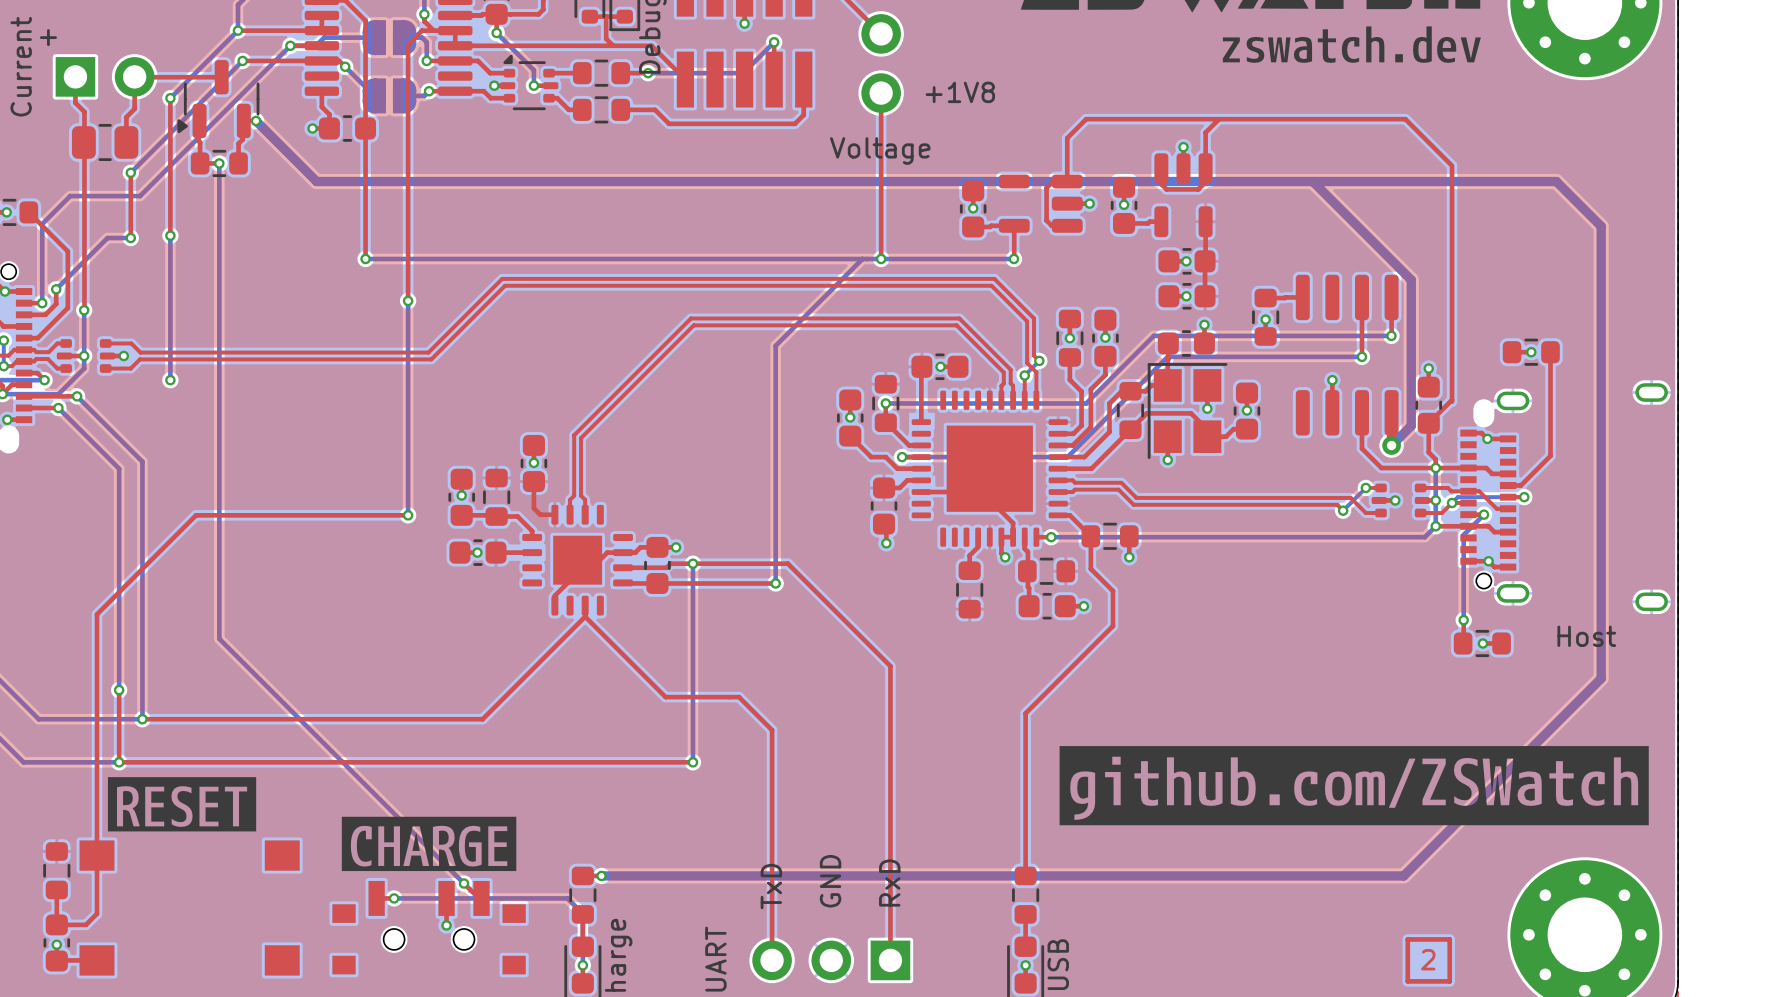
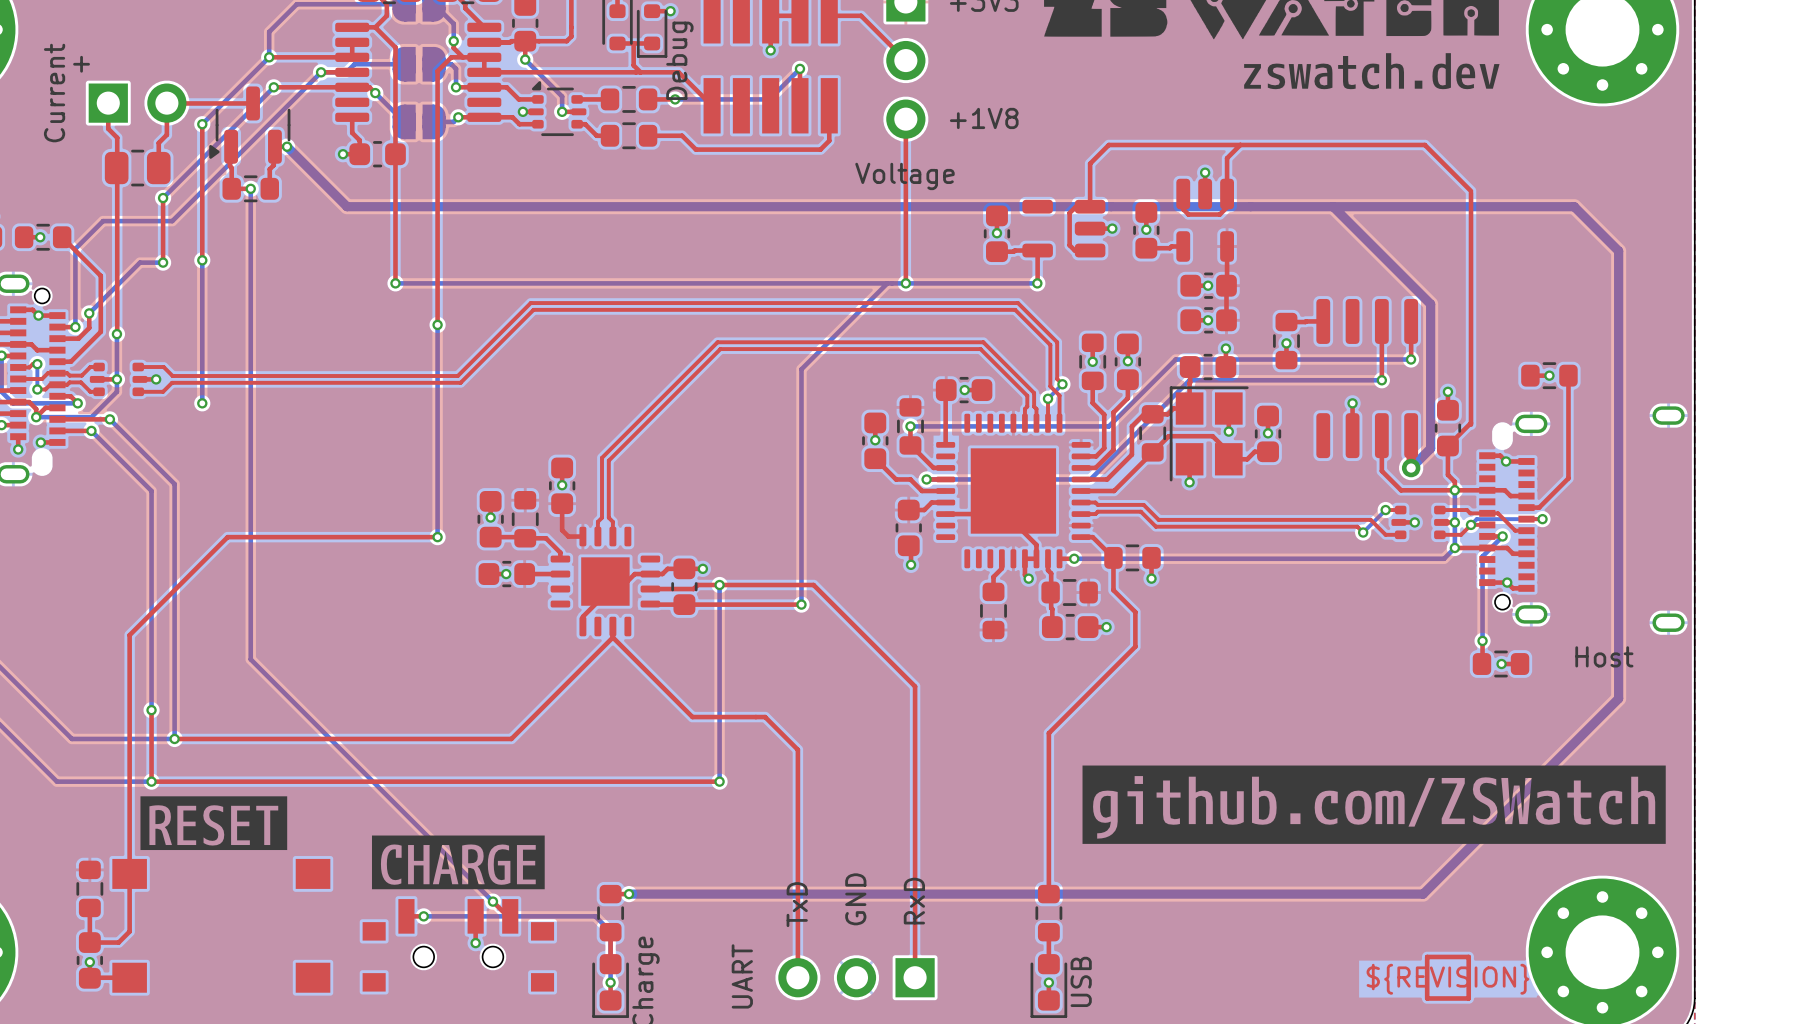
text: 2 (1428, 959) -> ${REVISION} (1447, 979)

